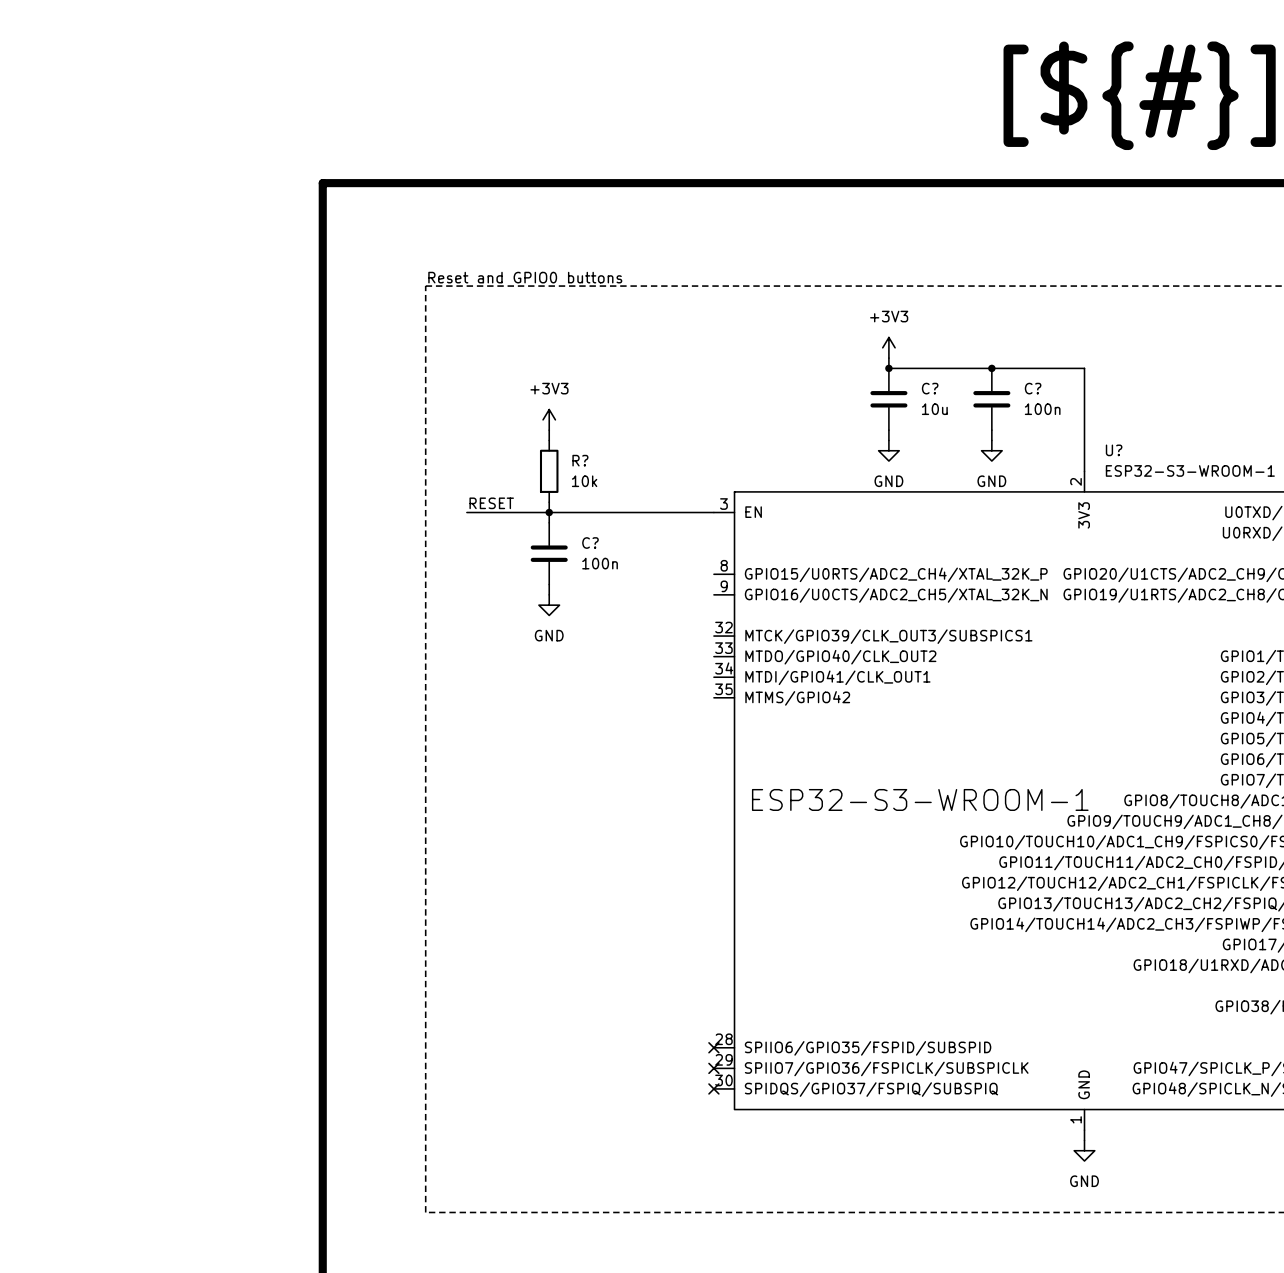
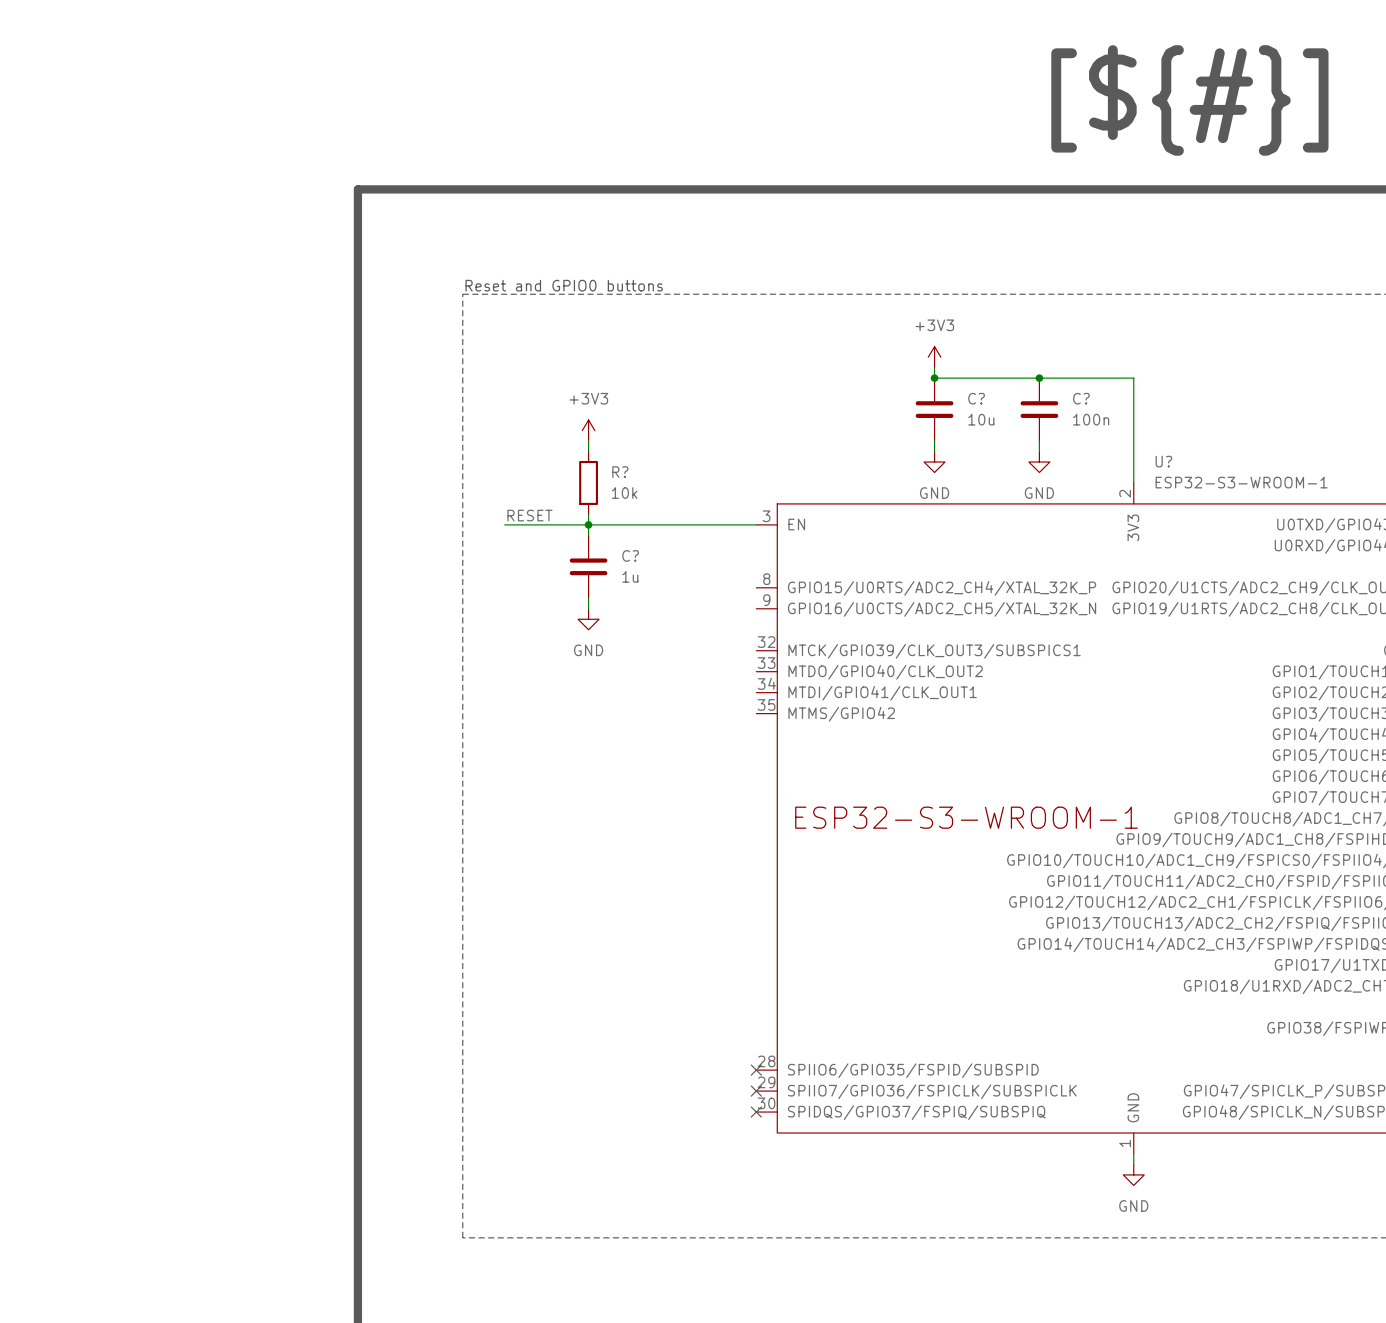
C? value: 100n (600, 563) -> 1u (630, 576)

